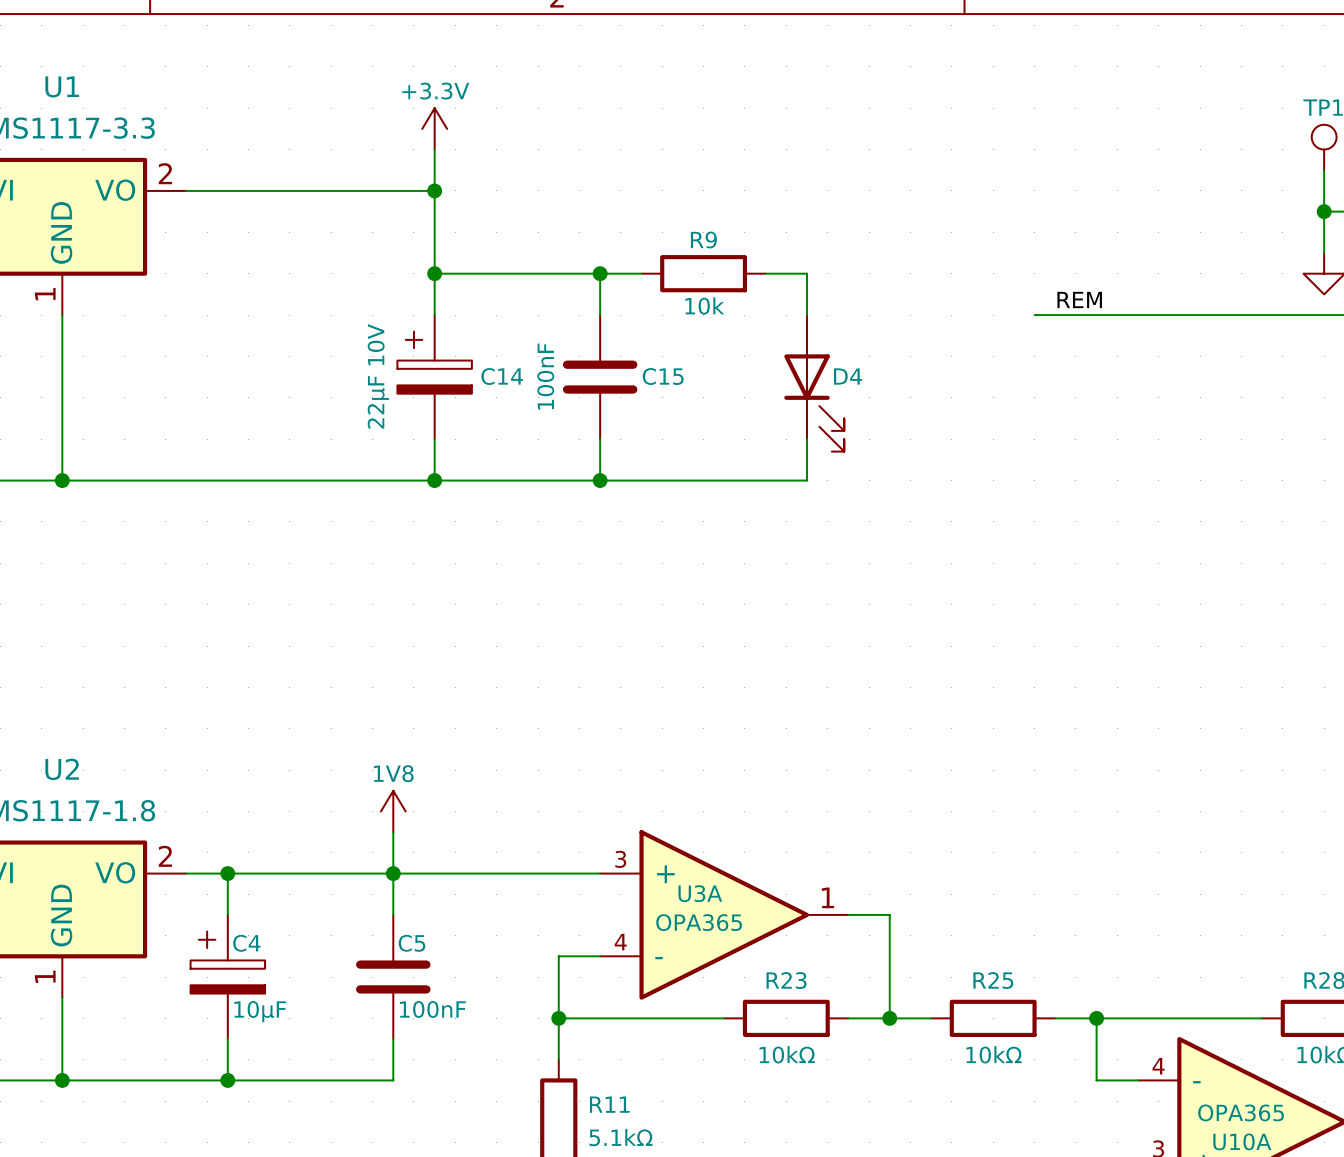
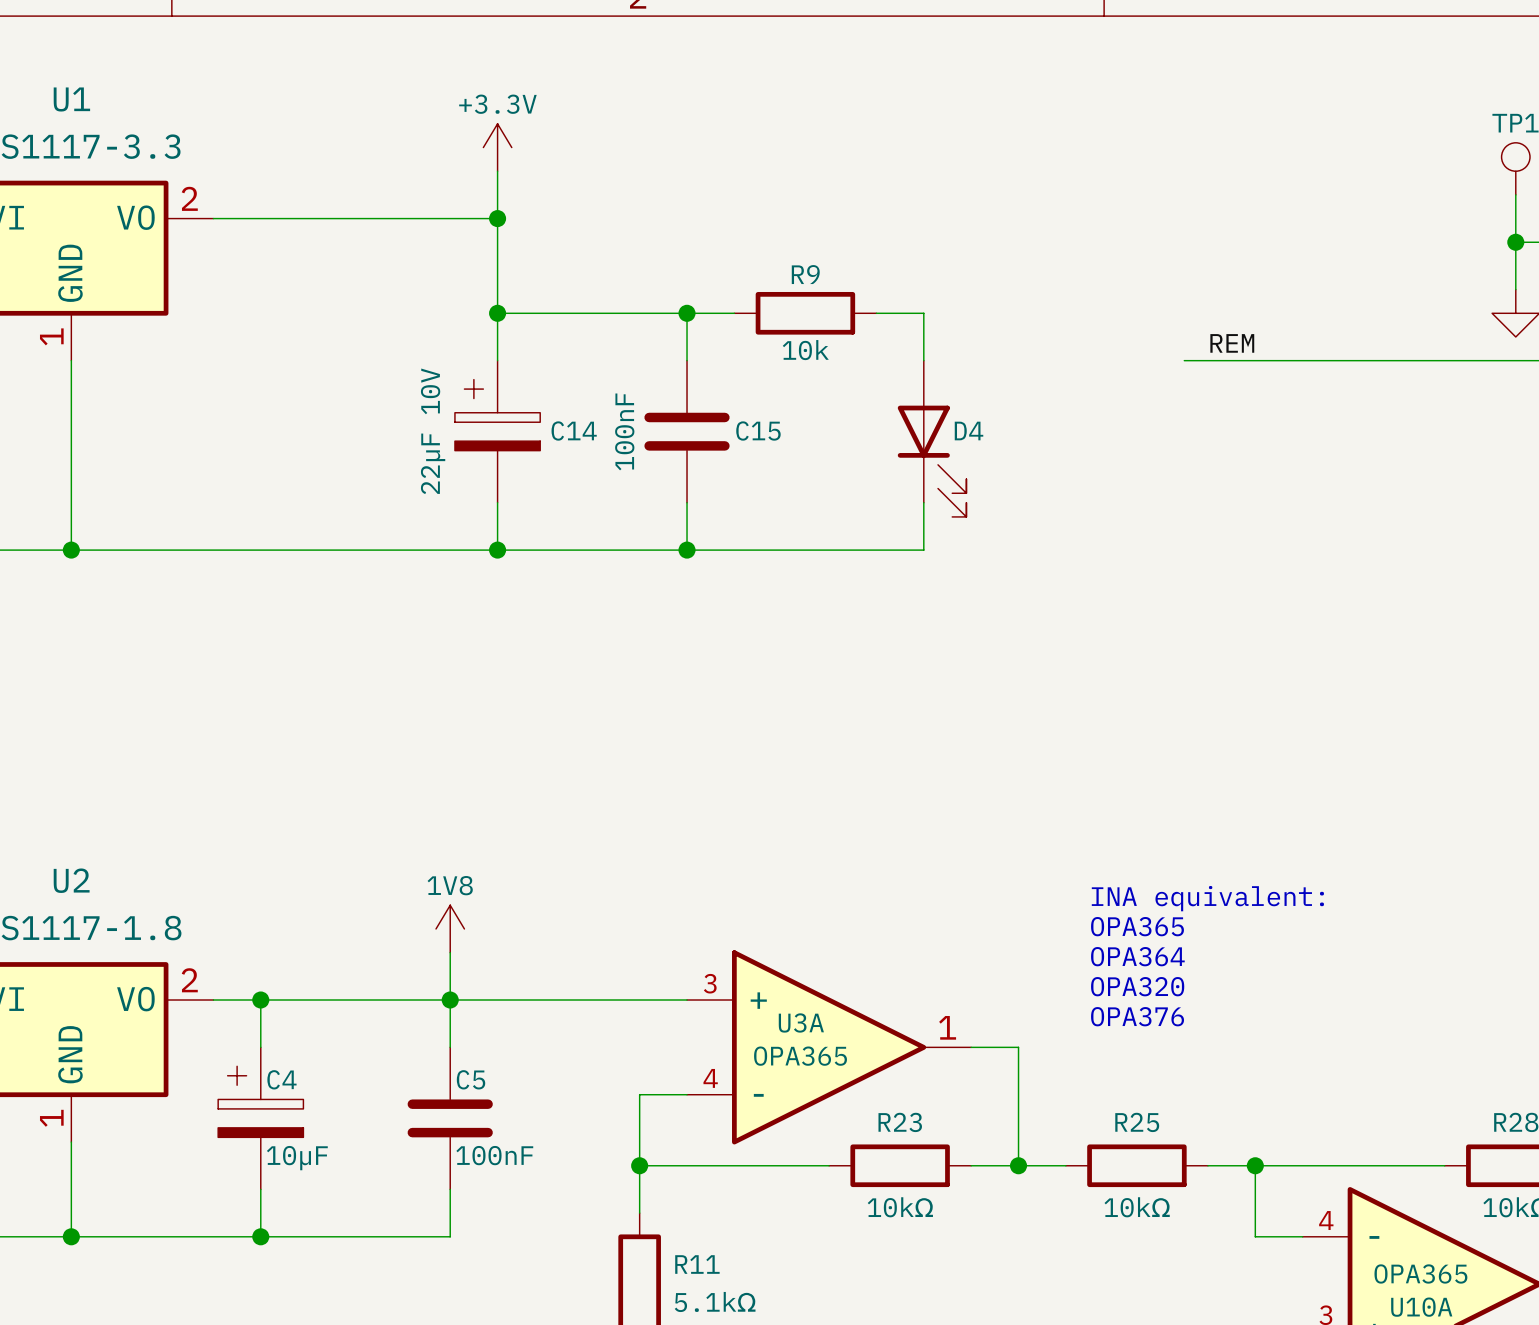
text: none -> INA equivalent: (1207, 898)
text: none -> OPA365 (1137, 926)
text: none -> OPA364 (1137, 956)
text: none -> OPA320 (1137, 986)
text: none -> OPA376 (1137, 1016)

